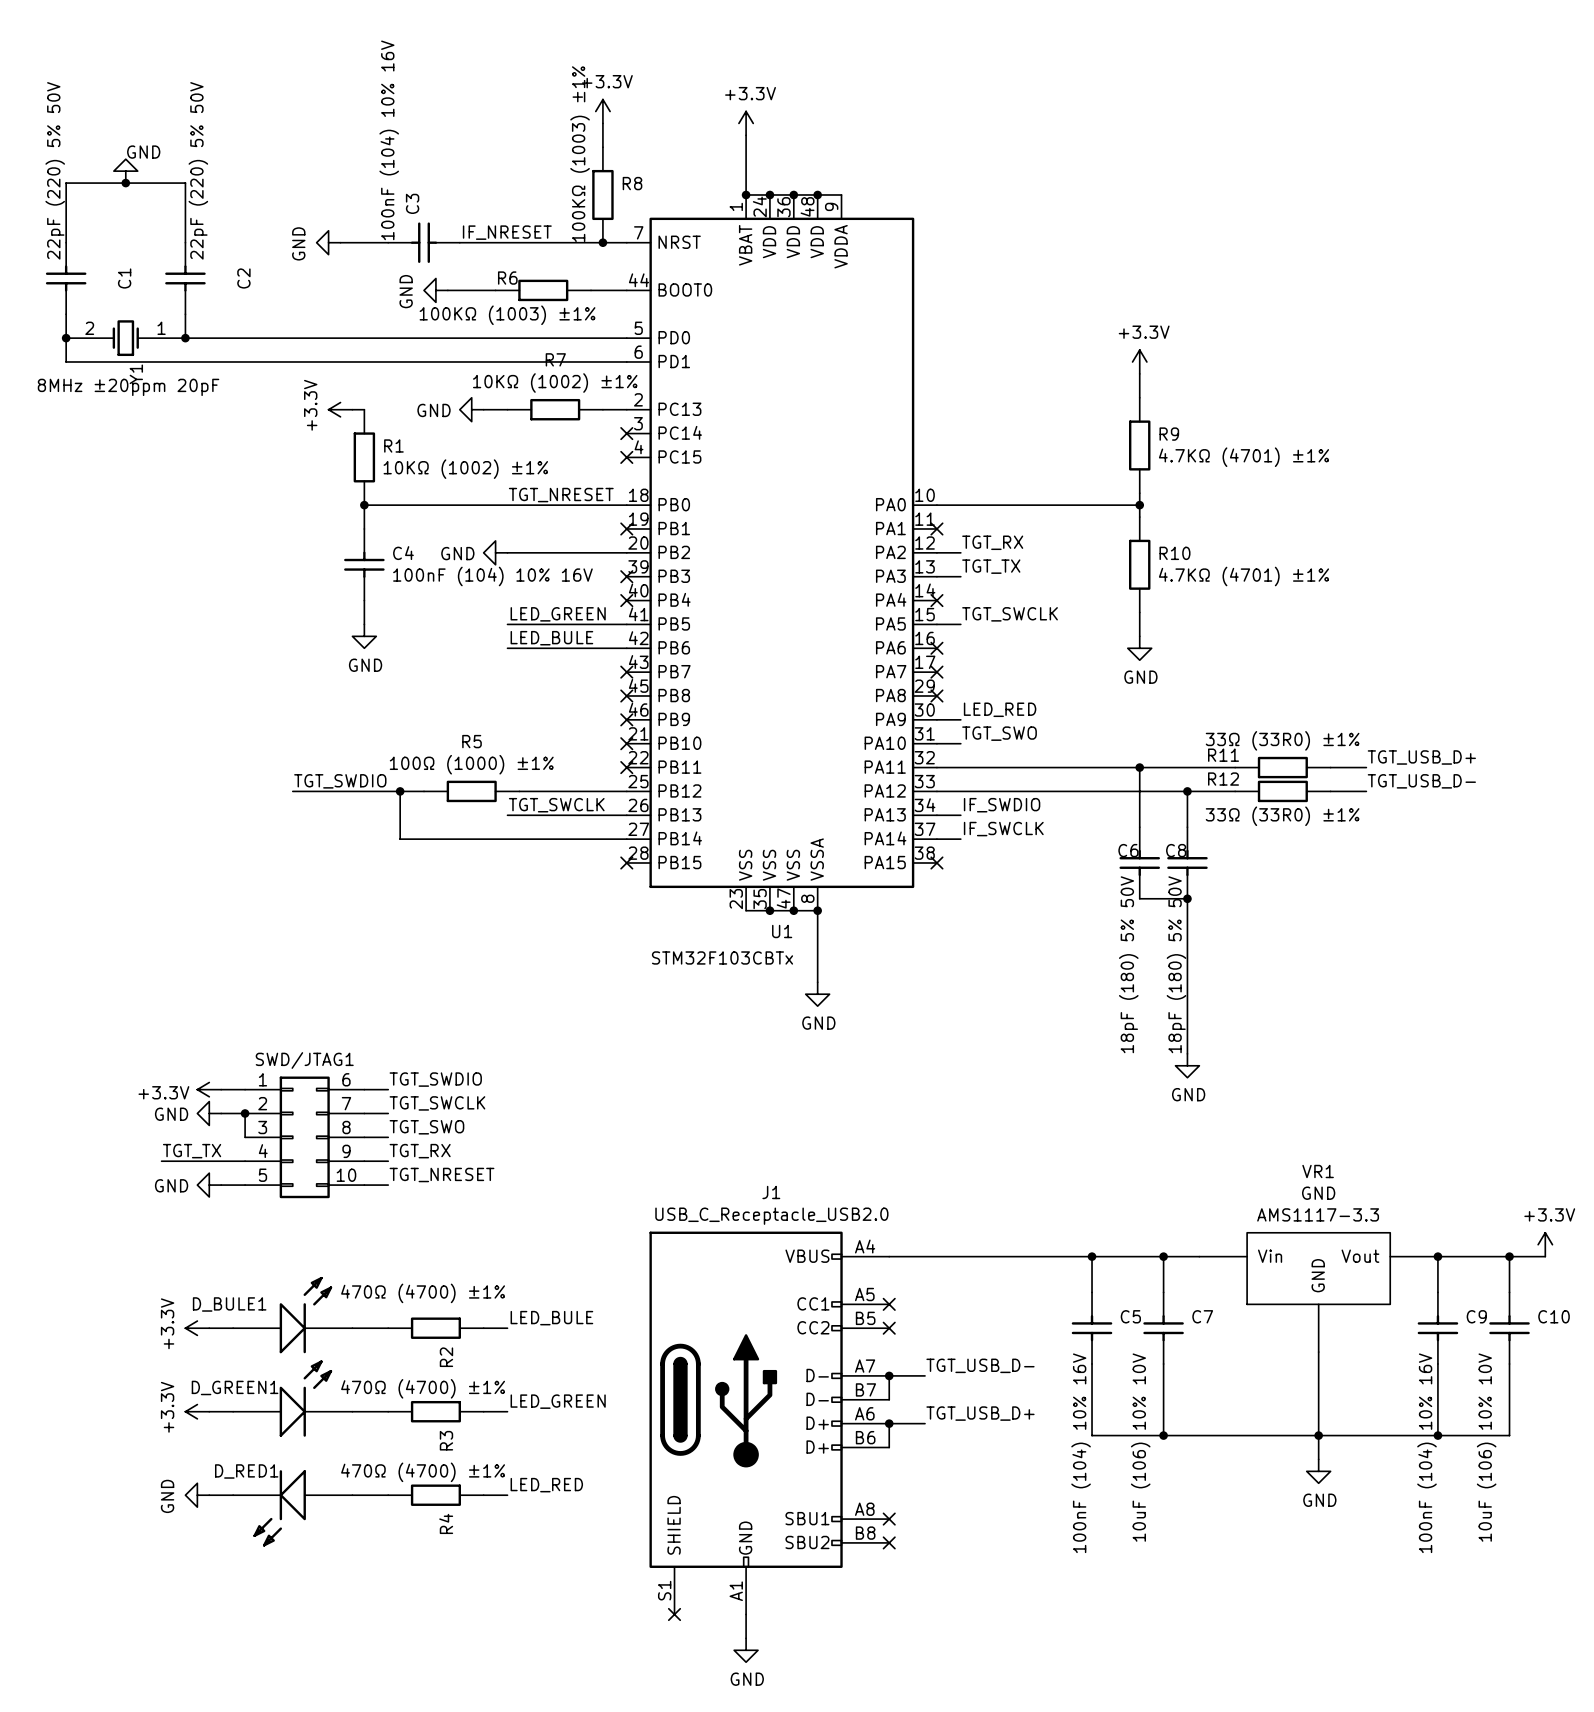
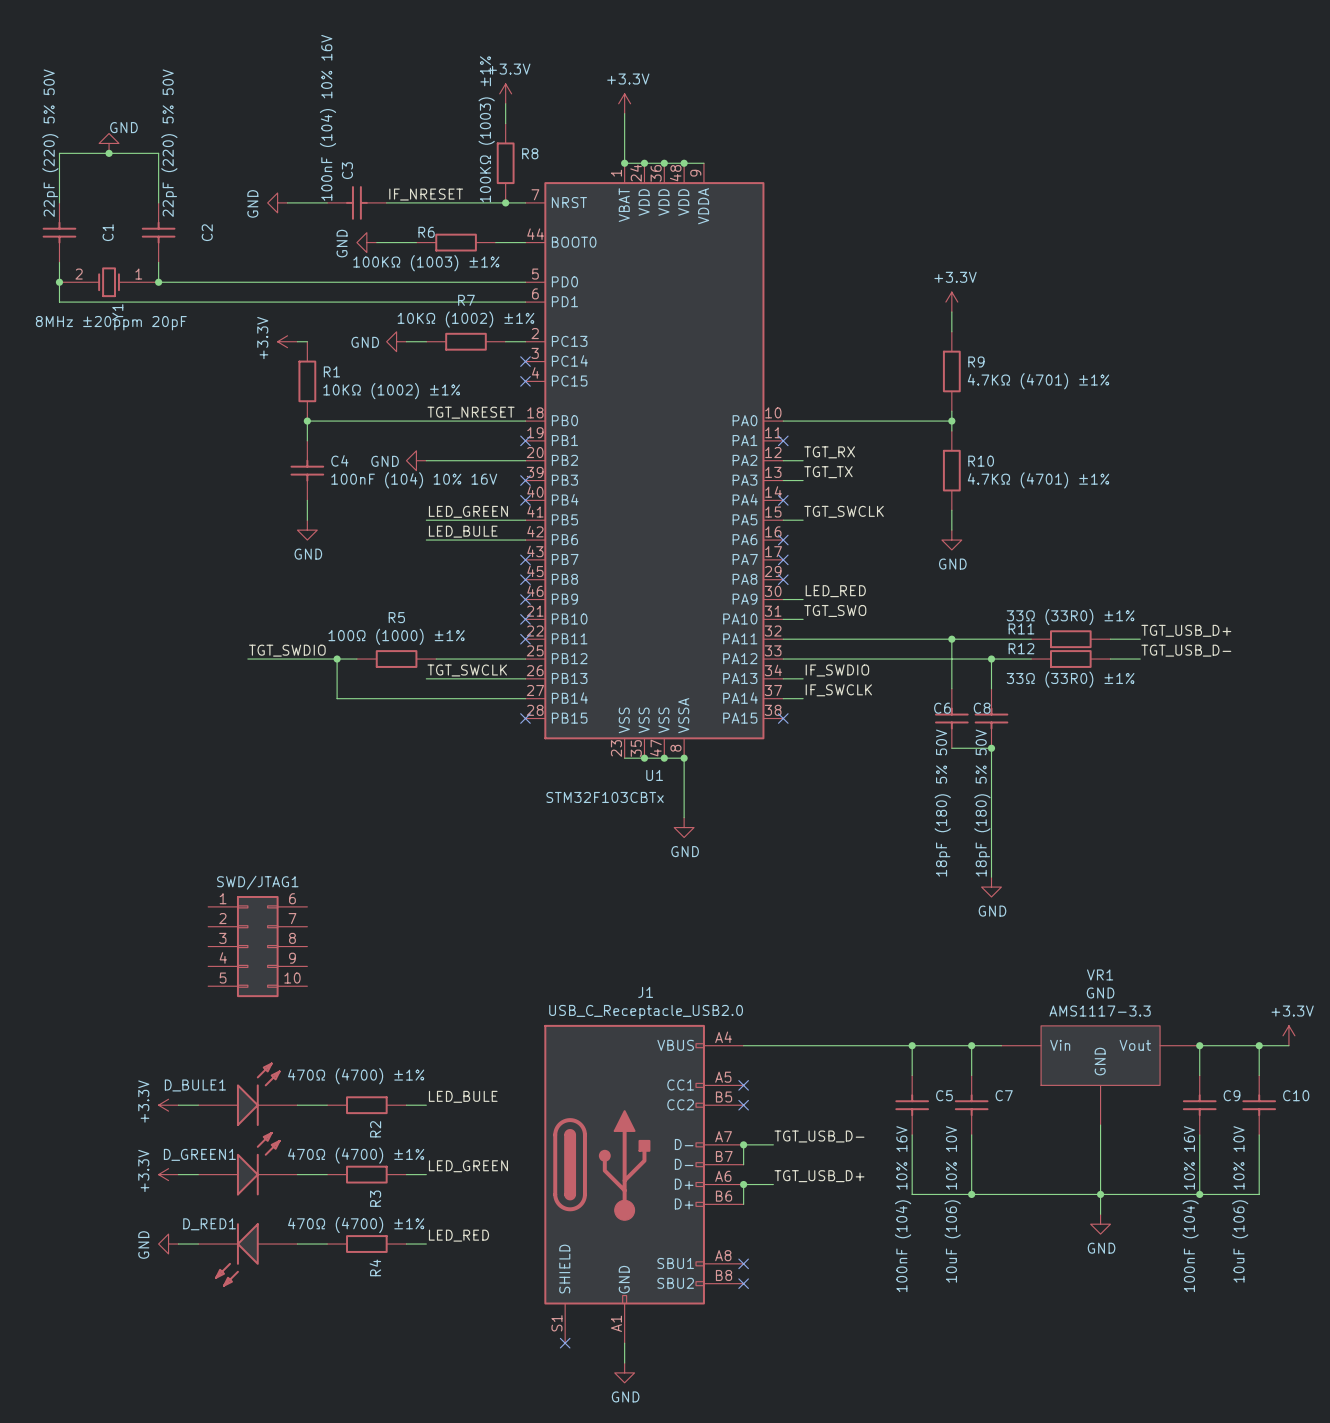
label: TGT_SWDIO (435, 1079) -> none
power symbol: +3.3V (209, 1089) -> none
wire: (221, 1089) (245, 1089) -> none
wire: (364, 1089) (388, 1089) -> none
label: TGT_SWCLK (437, 1103) -> none
power symbol: GND (209, 1113) -> none
wire: (221, 1113) (245, 1113) (245, 1137) -> none
junction: (245, 1113) -> none
wire: (364, 1113) (388, 1113) -> none
label: TGT_SWO (426, 1127) -> none
wire: (364, 1137) (388, 1137) -> none
label: TGT_TX (192, 1151) -> none
label: TGT_RX (420, 1151) -> none
wire: (161, 1161) (245, 1161) -> none
wire: (364, 1161) (388, 1161) -> none
label: TGT_NRESET (441, 1174) -> none
power symbol: GND (209, 1185) -> none
wire: (221, 1185) (245, 1185) -> none
wire: (364, 1185) (388, 1185) -> none

